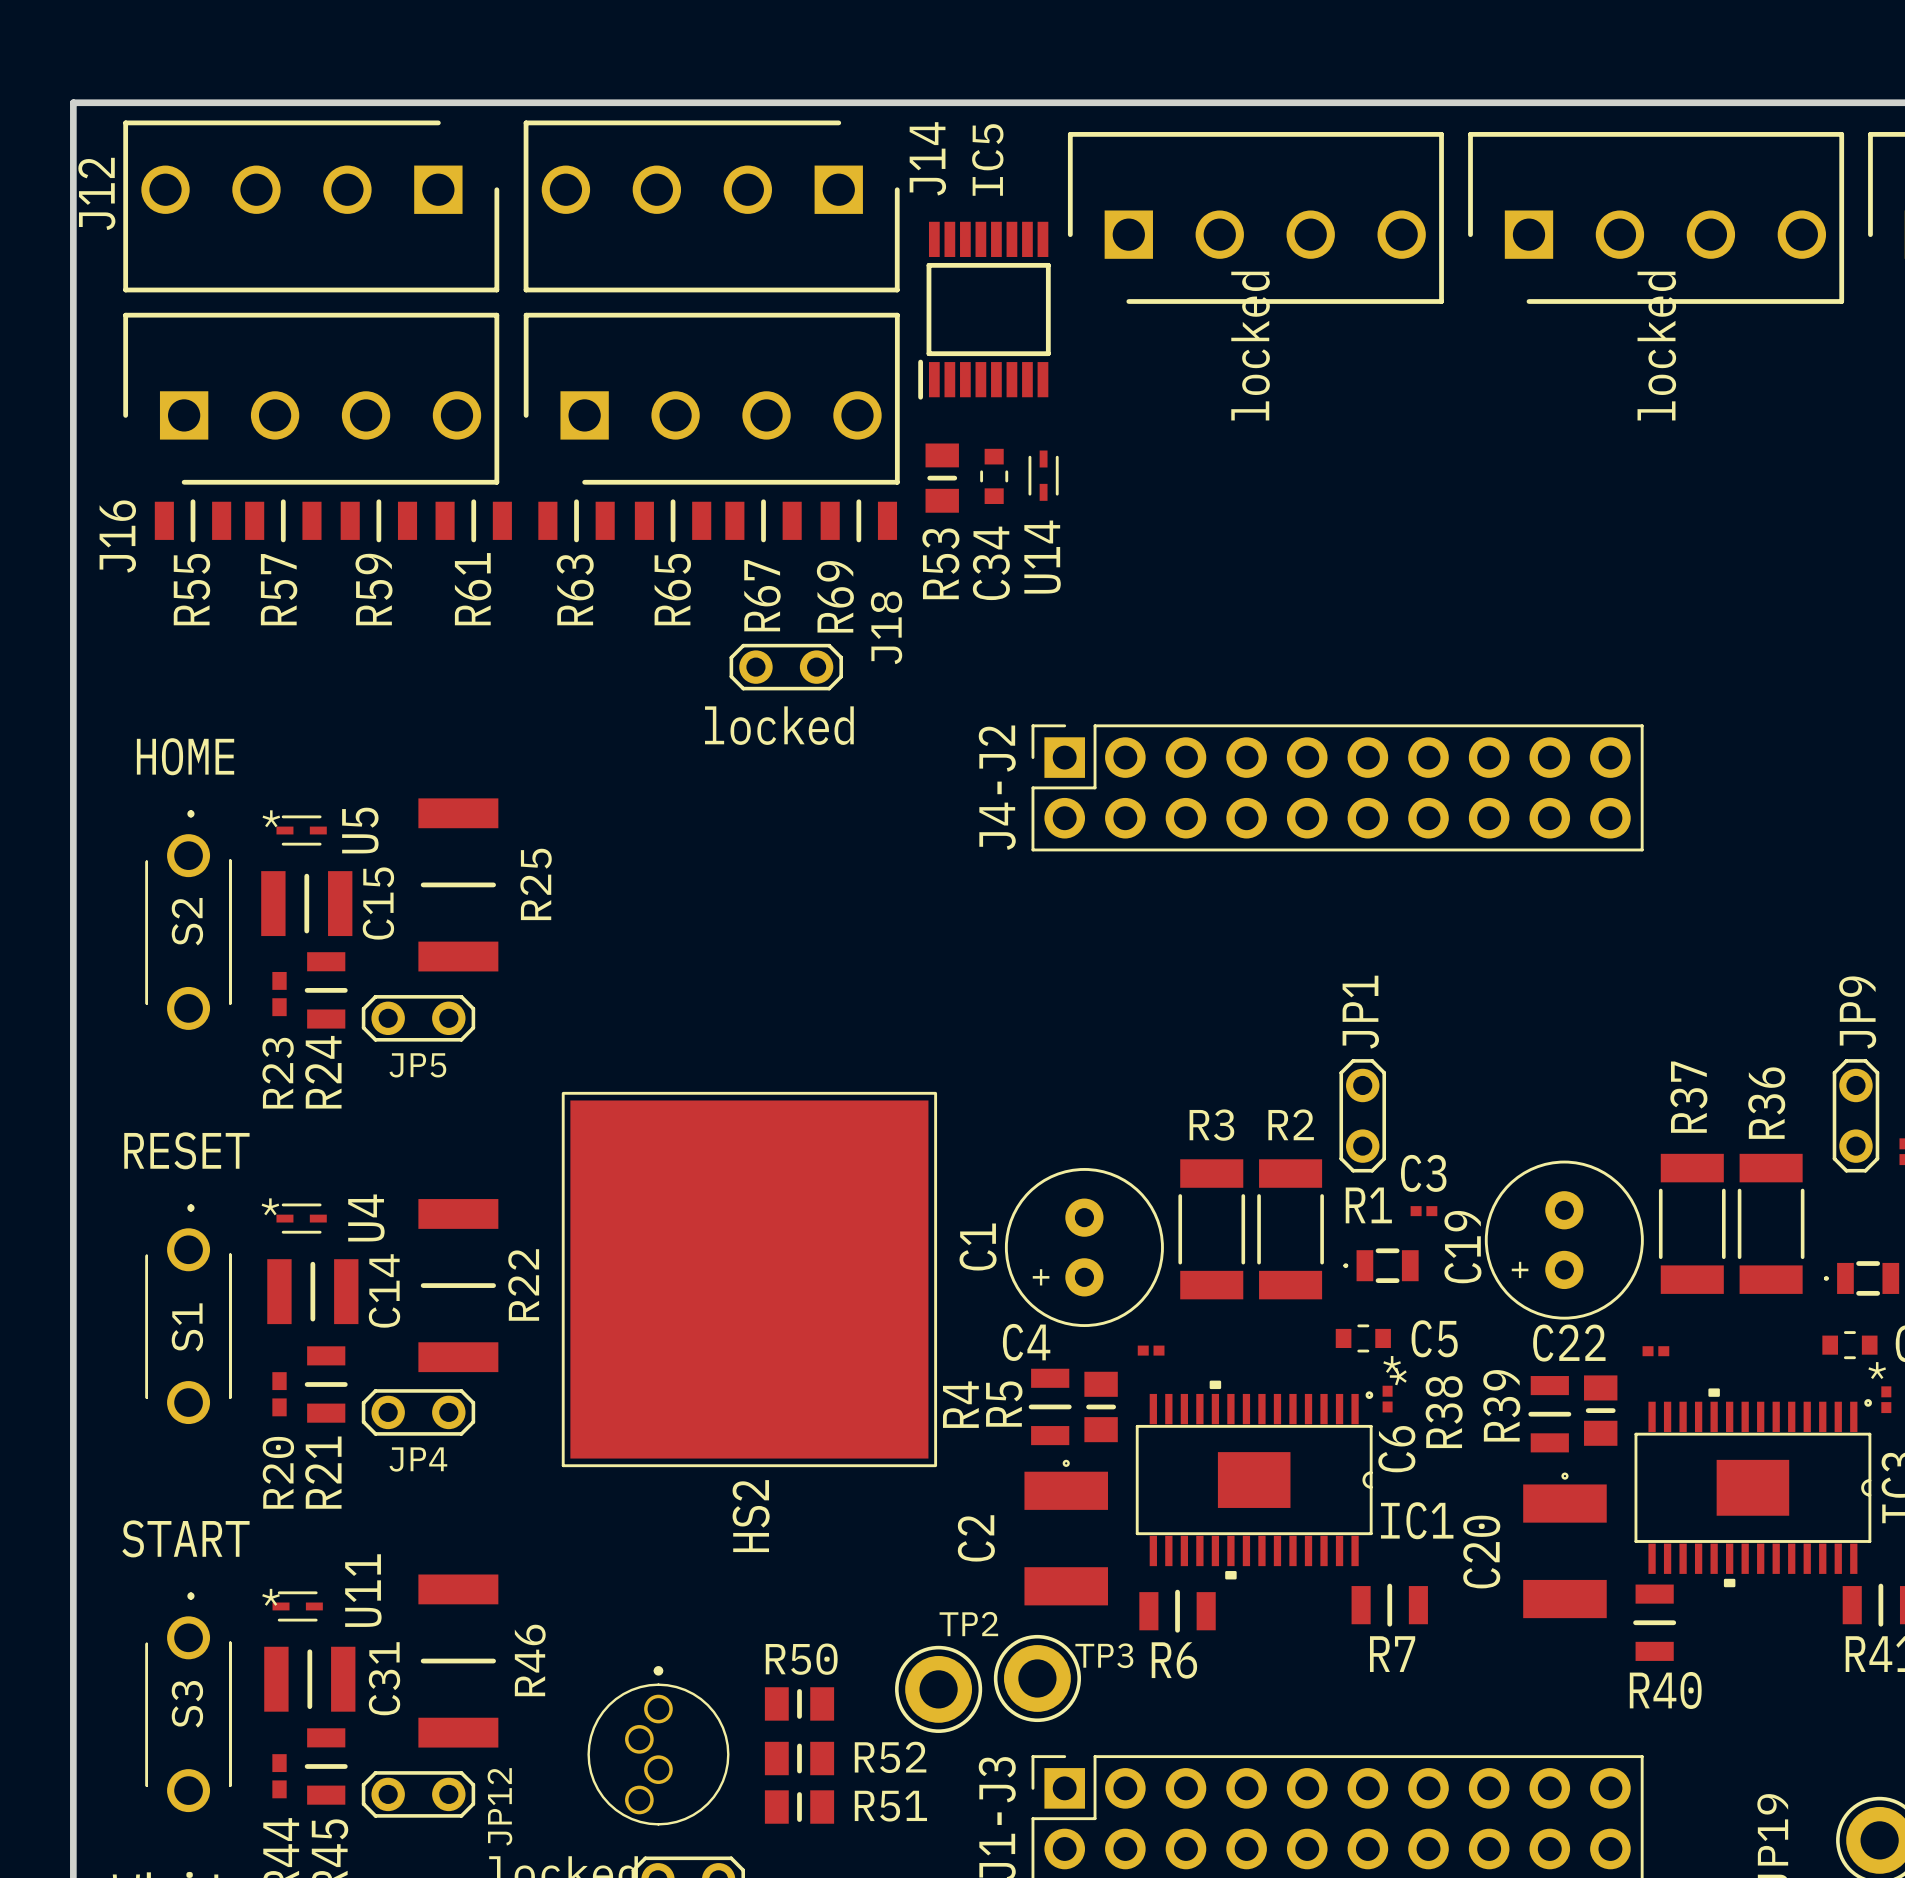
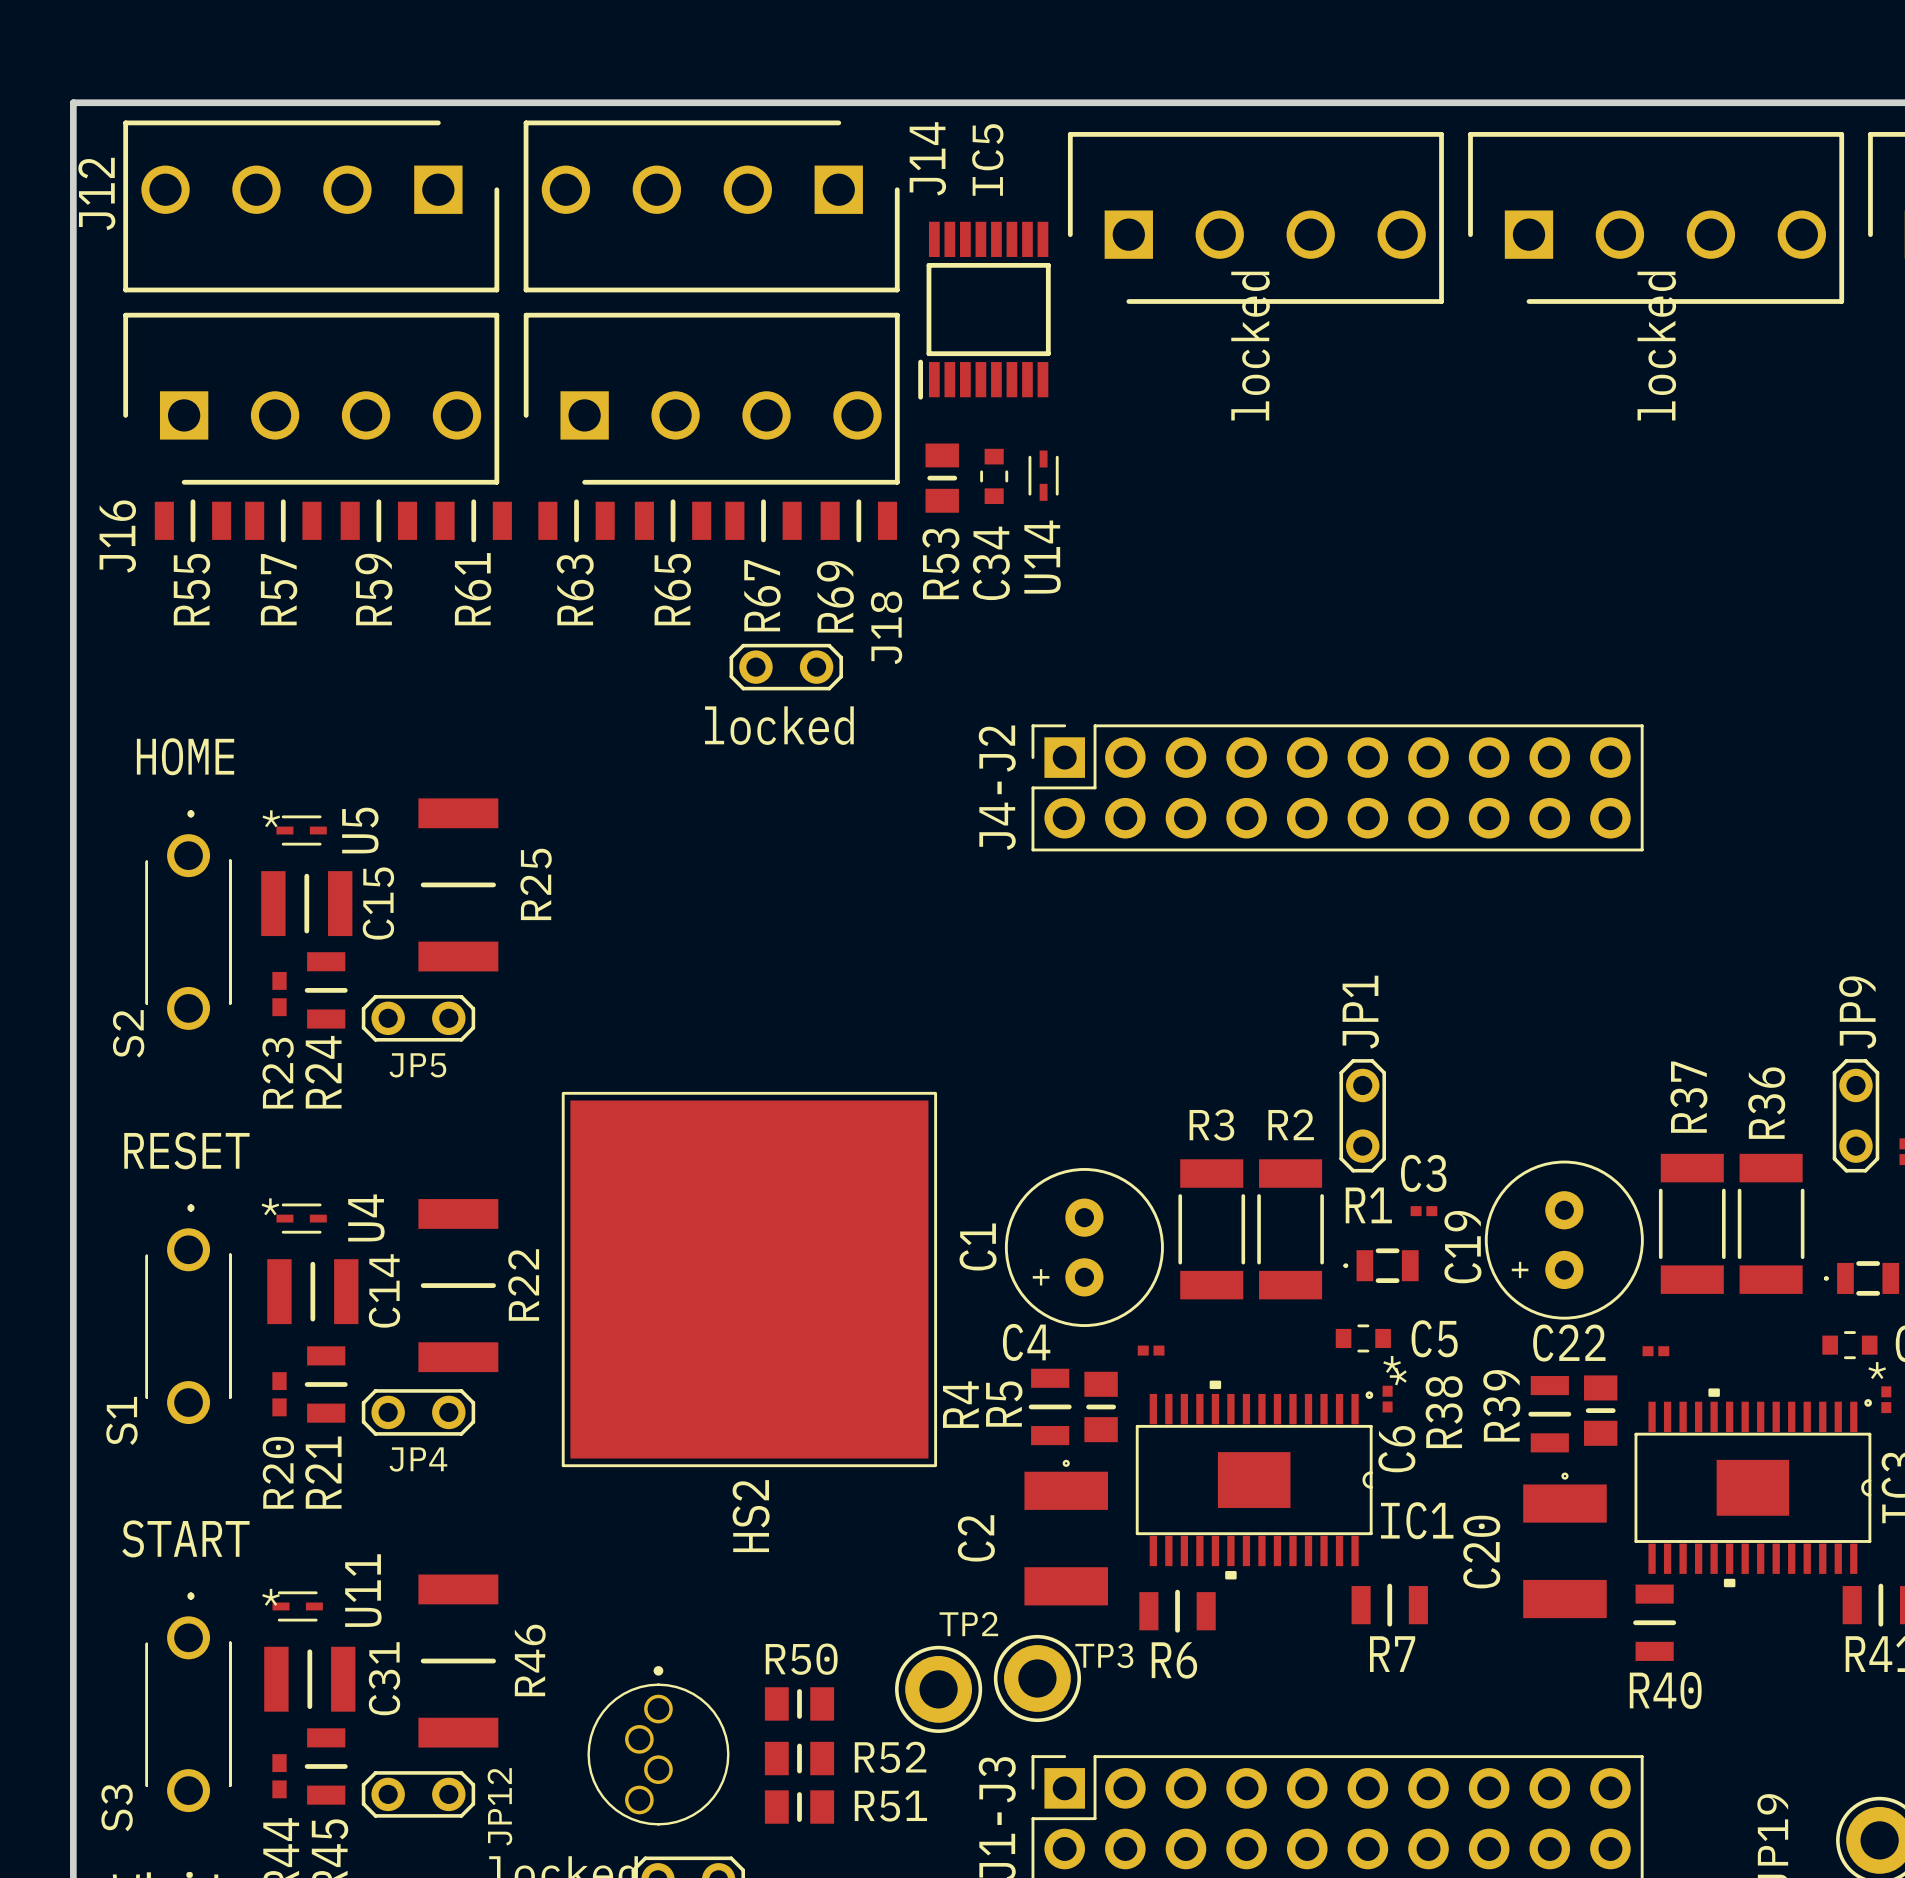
S2 name position: S2 (187, 921) -> S2 (128, 1033)
S1 name position: S1 (187, 1327) -> S1 (121, 1420)
S3 name position: S3 (187, 1704) -> S3 (117, 1807)

